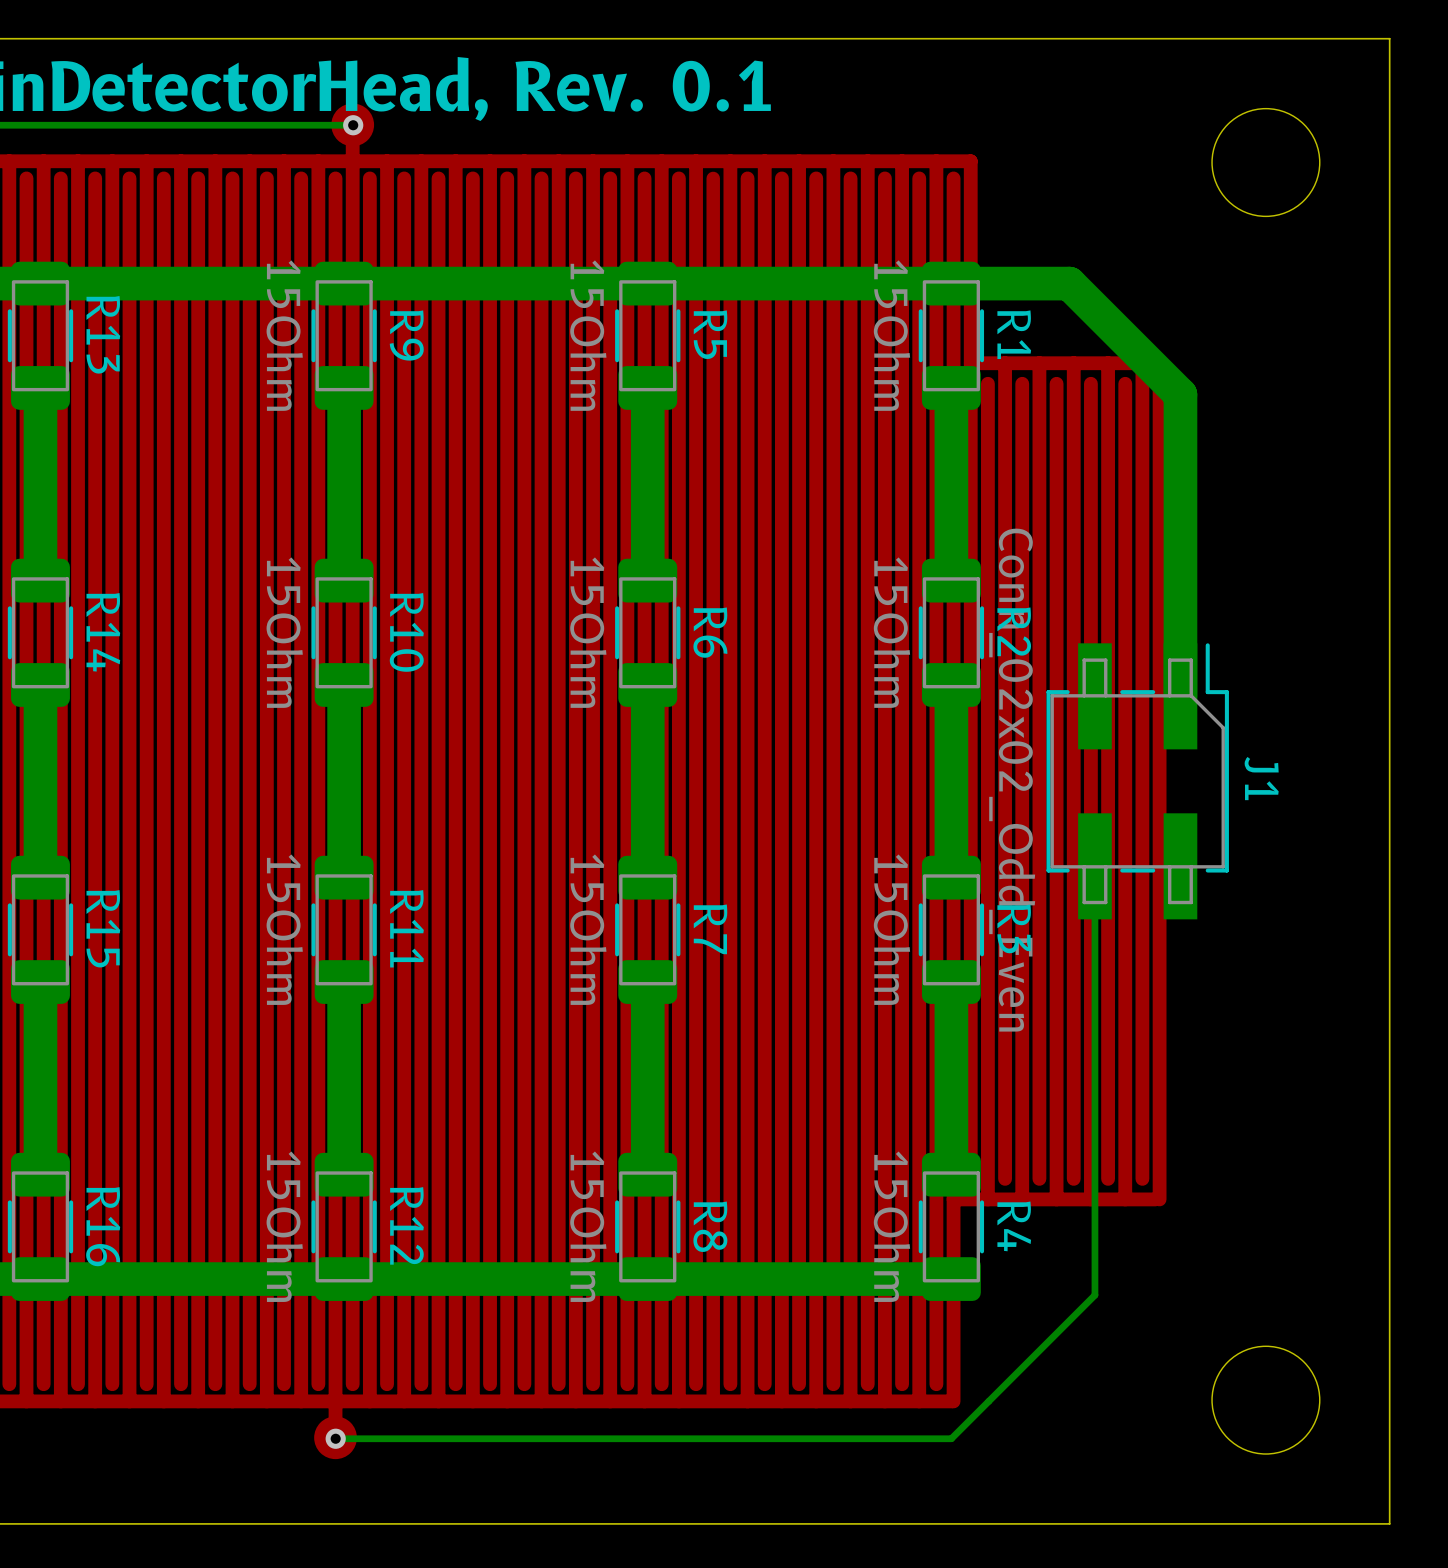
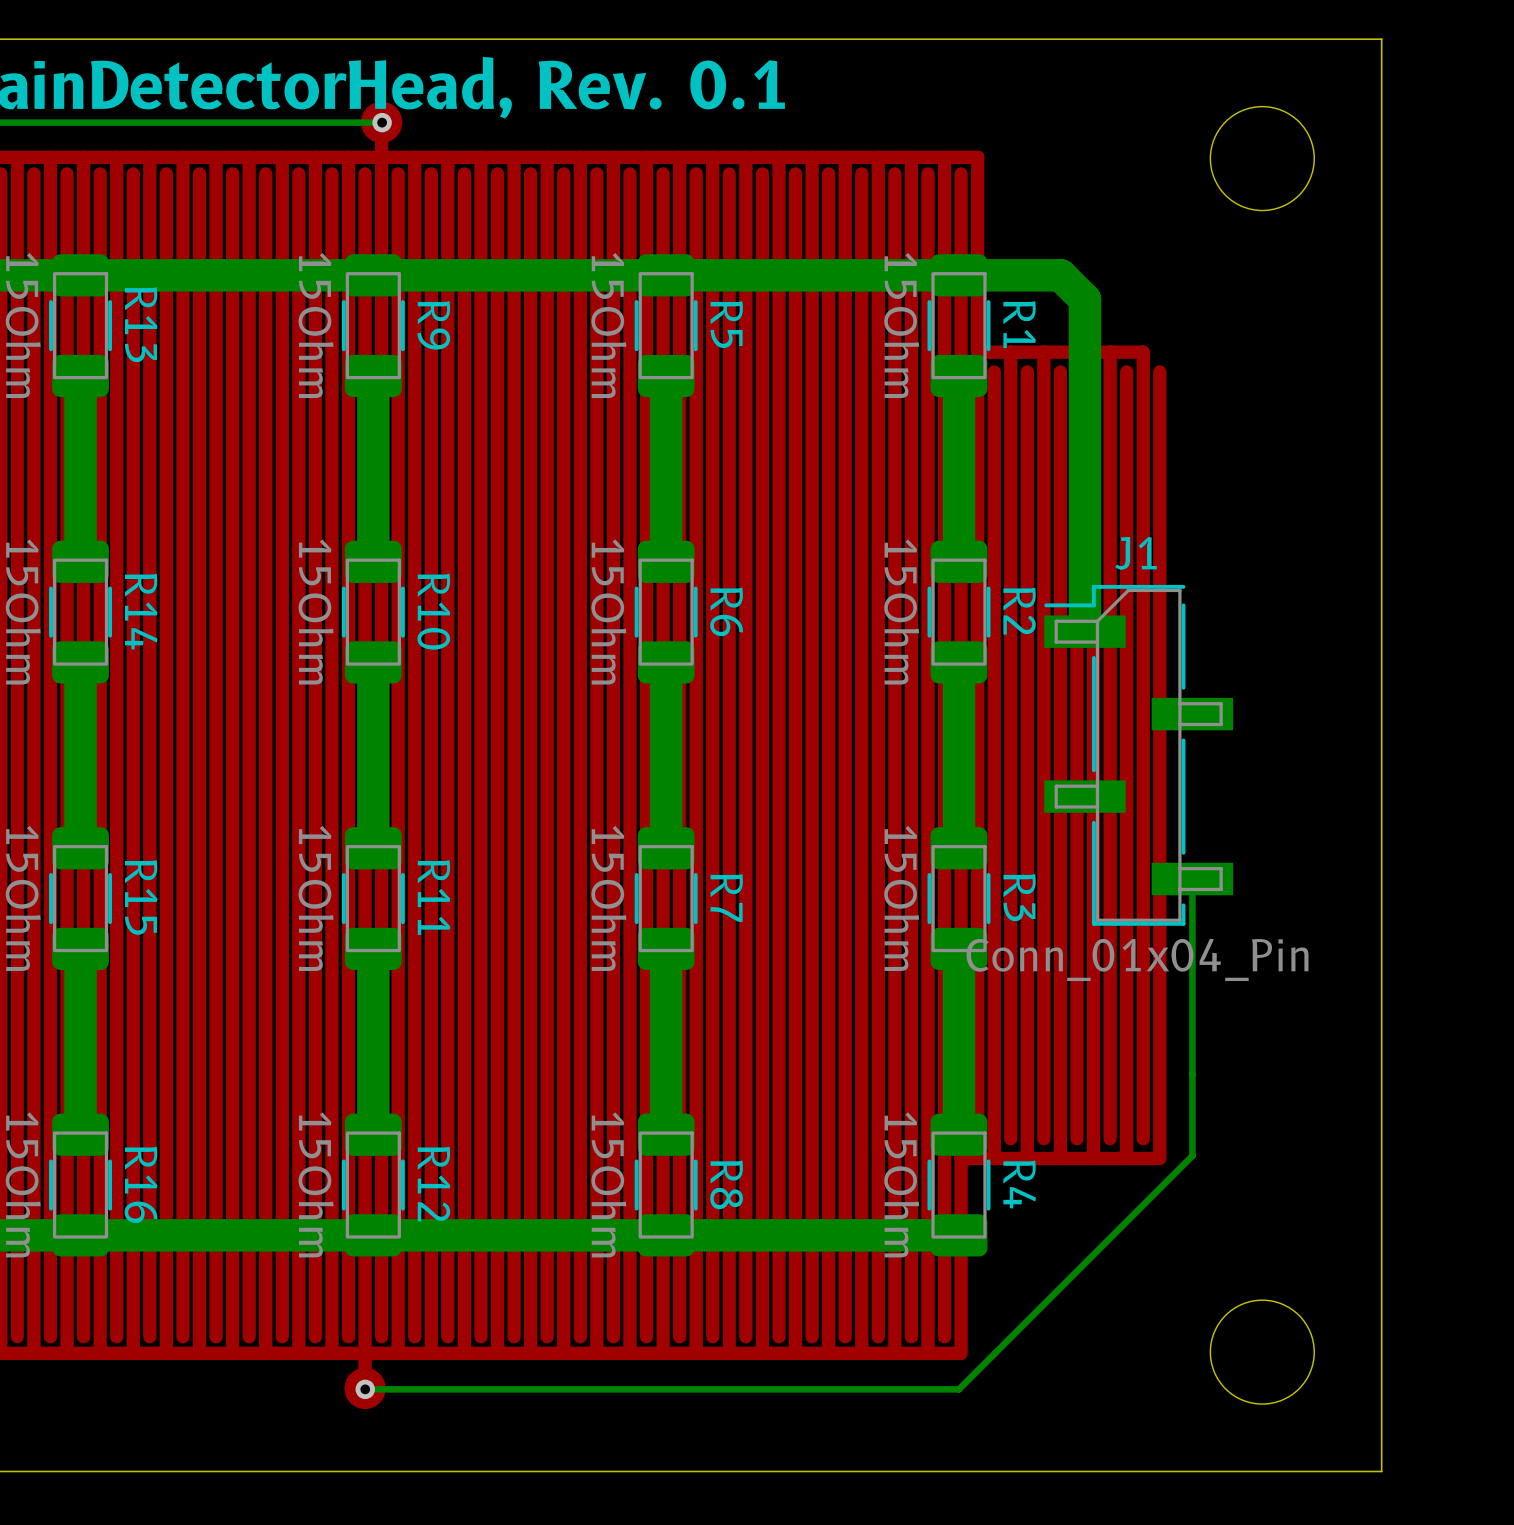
bottom track: (1056, 283) (1069, 283) (1180, 394) (1180, 696) -> (1060, 275) (1084, 299) (1084, 631)
J1 footprint: [1046, 643, 1229, 920] -> [1044, 584, 1234, 926]
J1 name position: J1 (1261, 778) -> J1 (1136, 553)
J1 value: Conn_02x02_Odd_Even (1012, 780) -> Conn_01x04_Pin (1137, 959)
bottom track: (1094, 866) (1094, 1295) -> (1192, 879) (1192, 1155) (1097, 1250)

